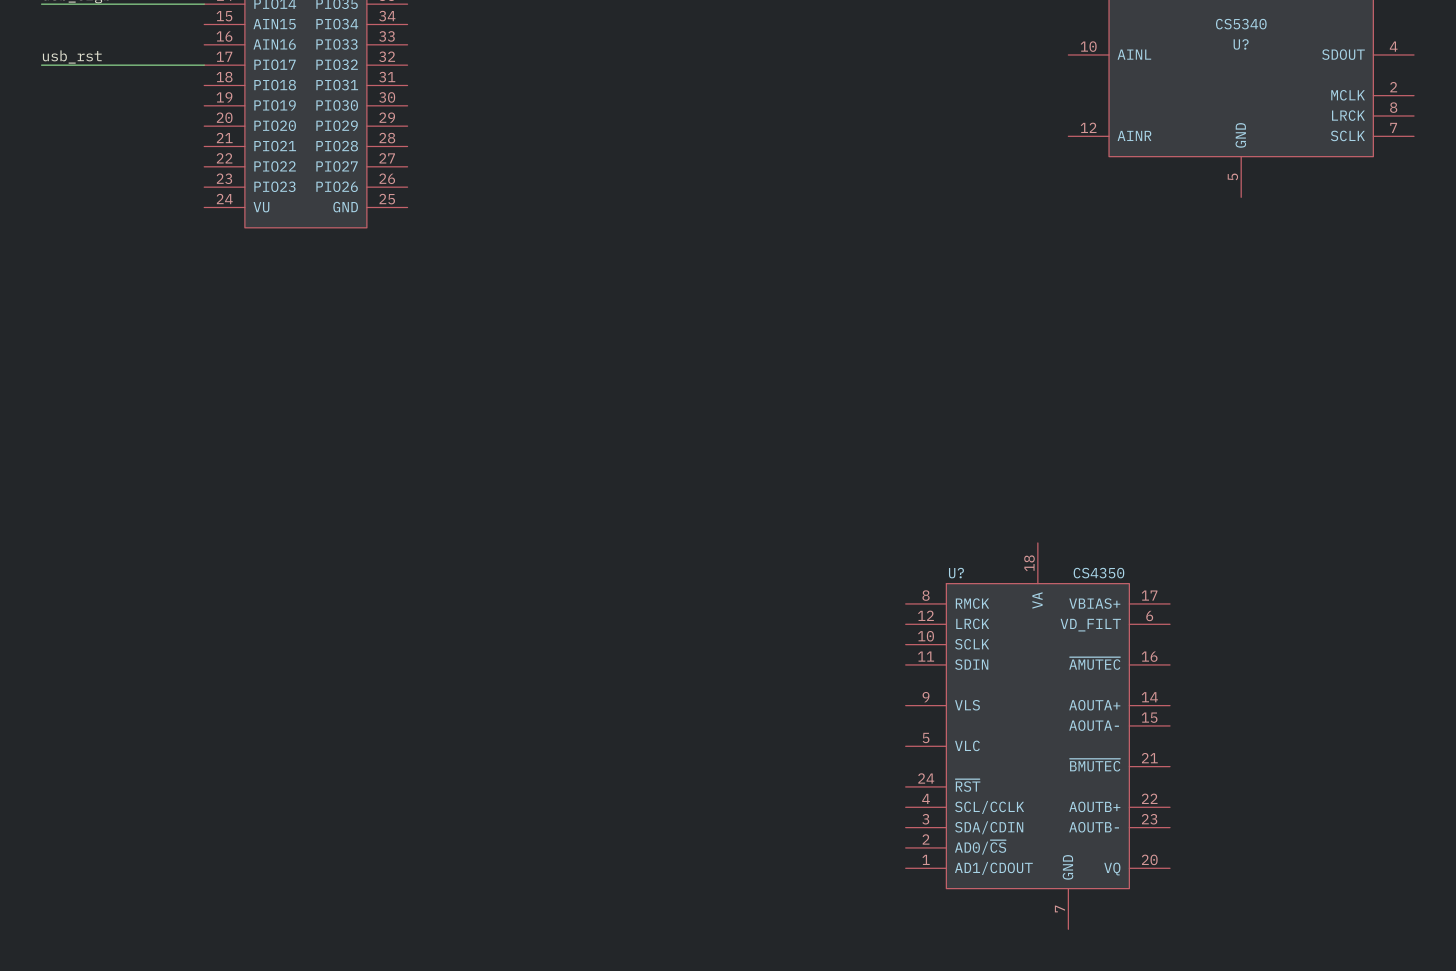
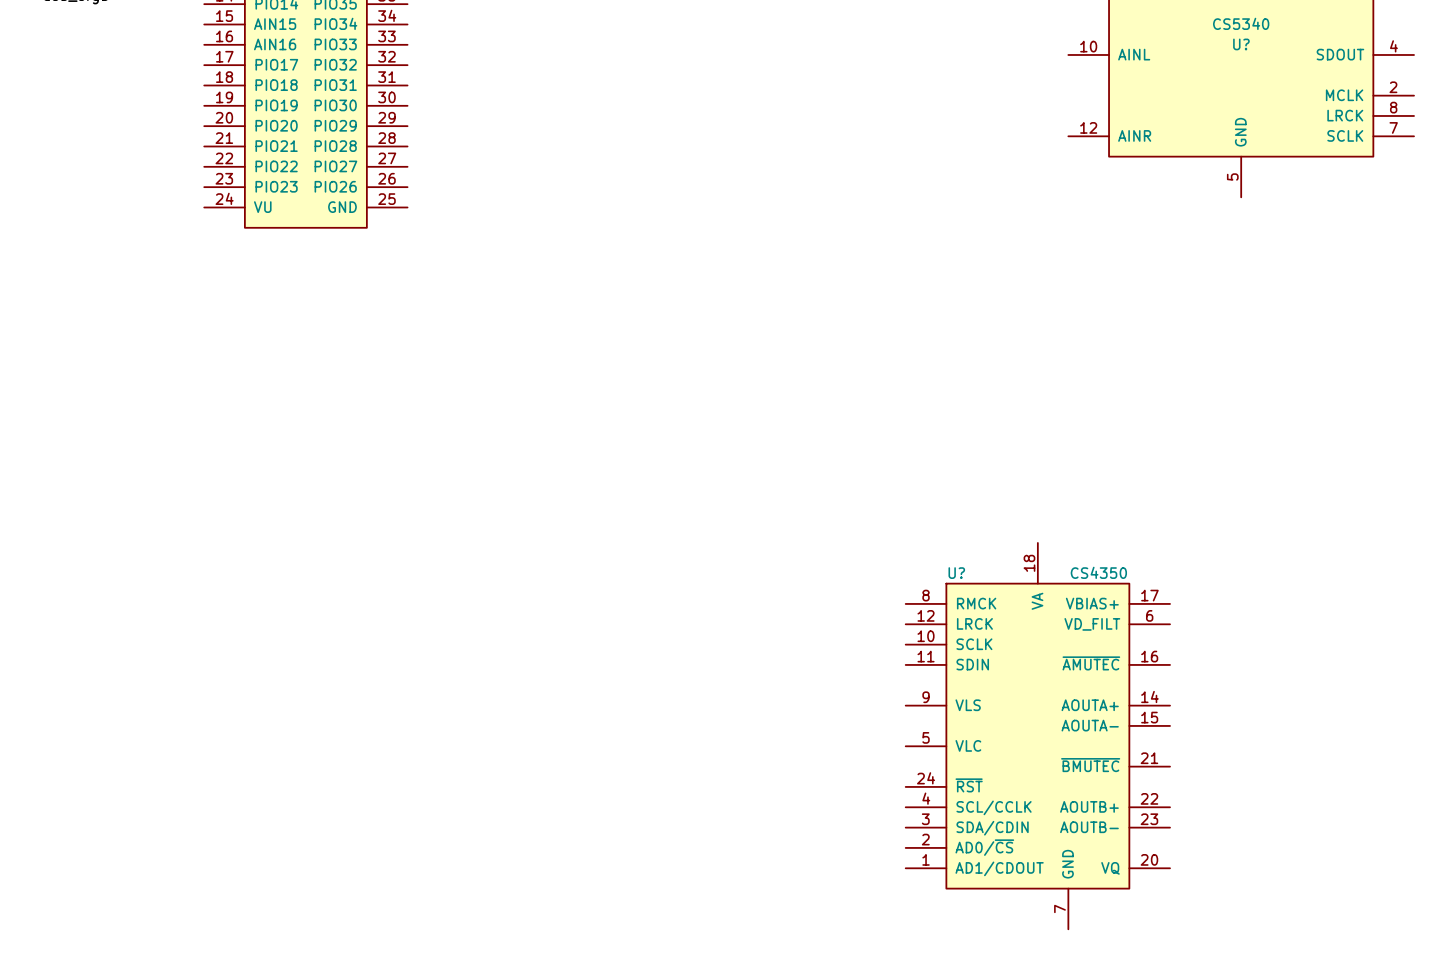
wire: (41, 4) (204, 4) -> none
label: usb_rst (72, 57) -> none
wire: (41, 65) (204, 65) -> none

